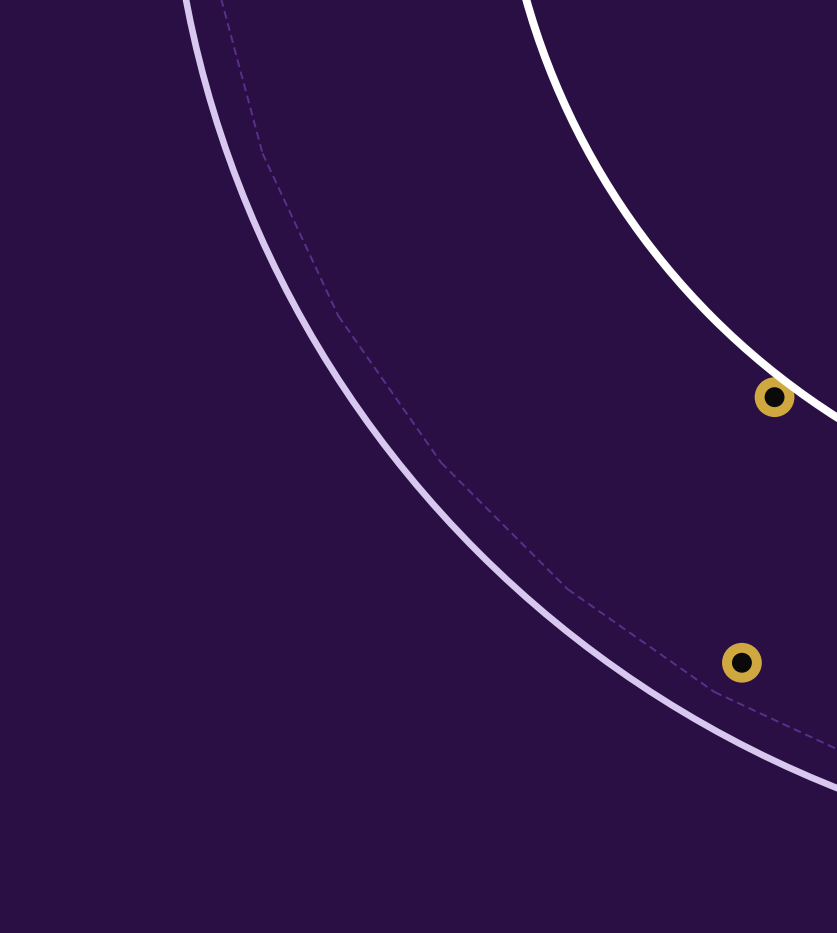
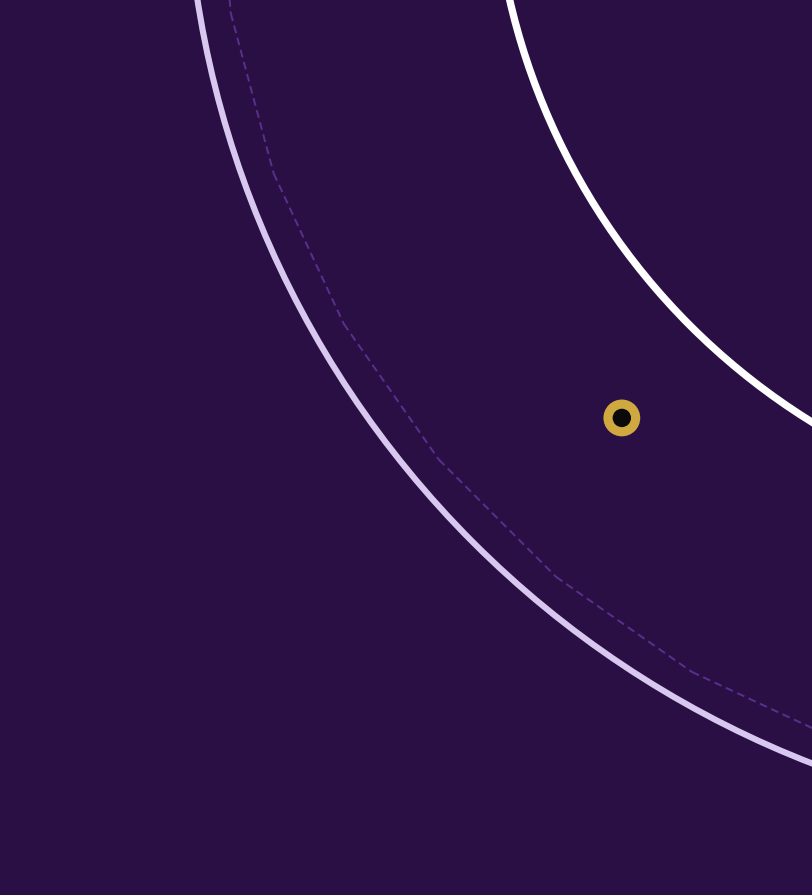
via: (774, 397) -> none
via: none -> (621, 417)
via: (741, 662) -> none

